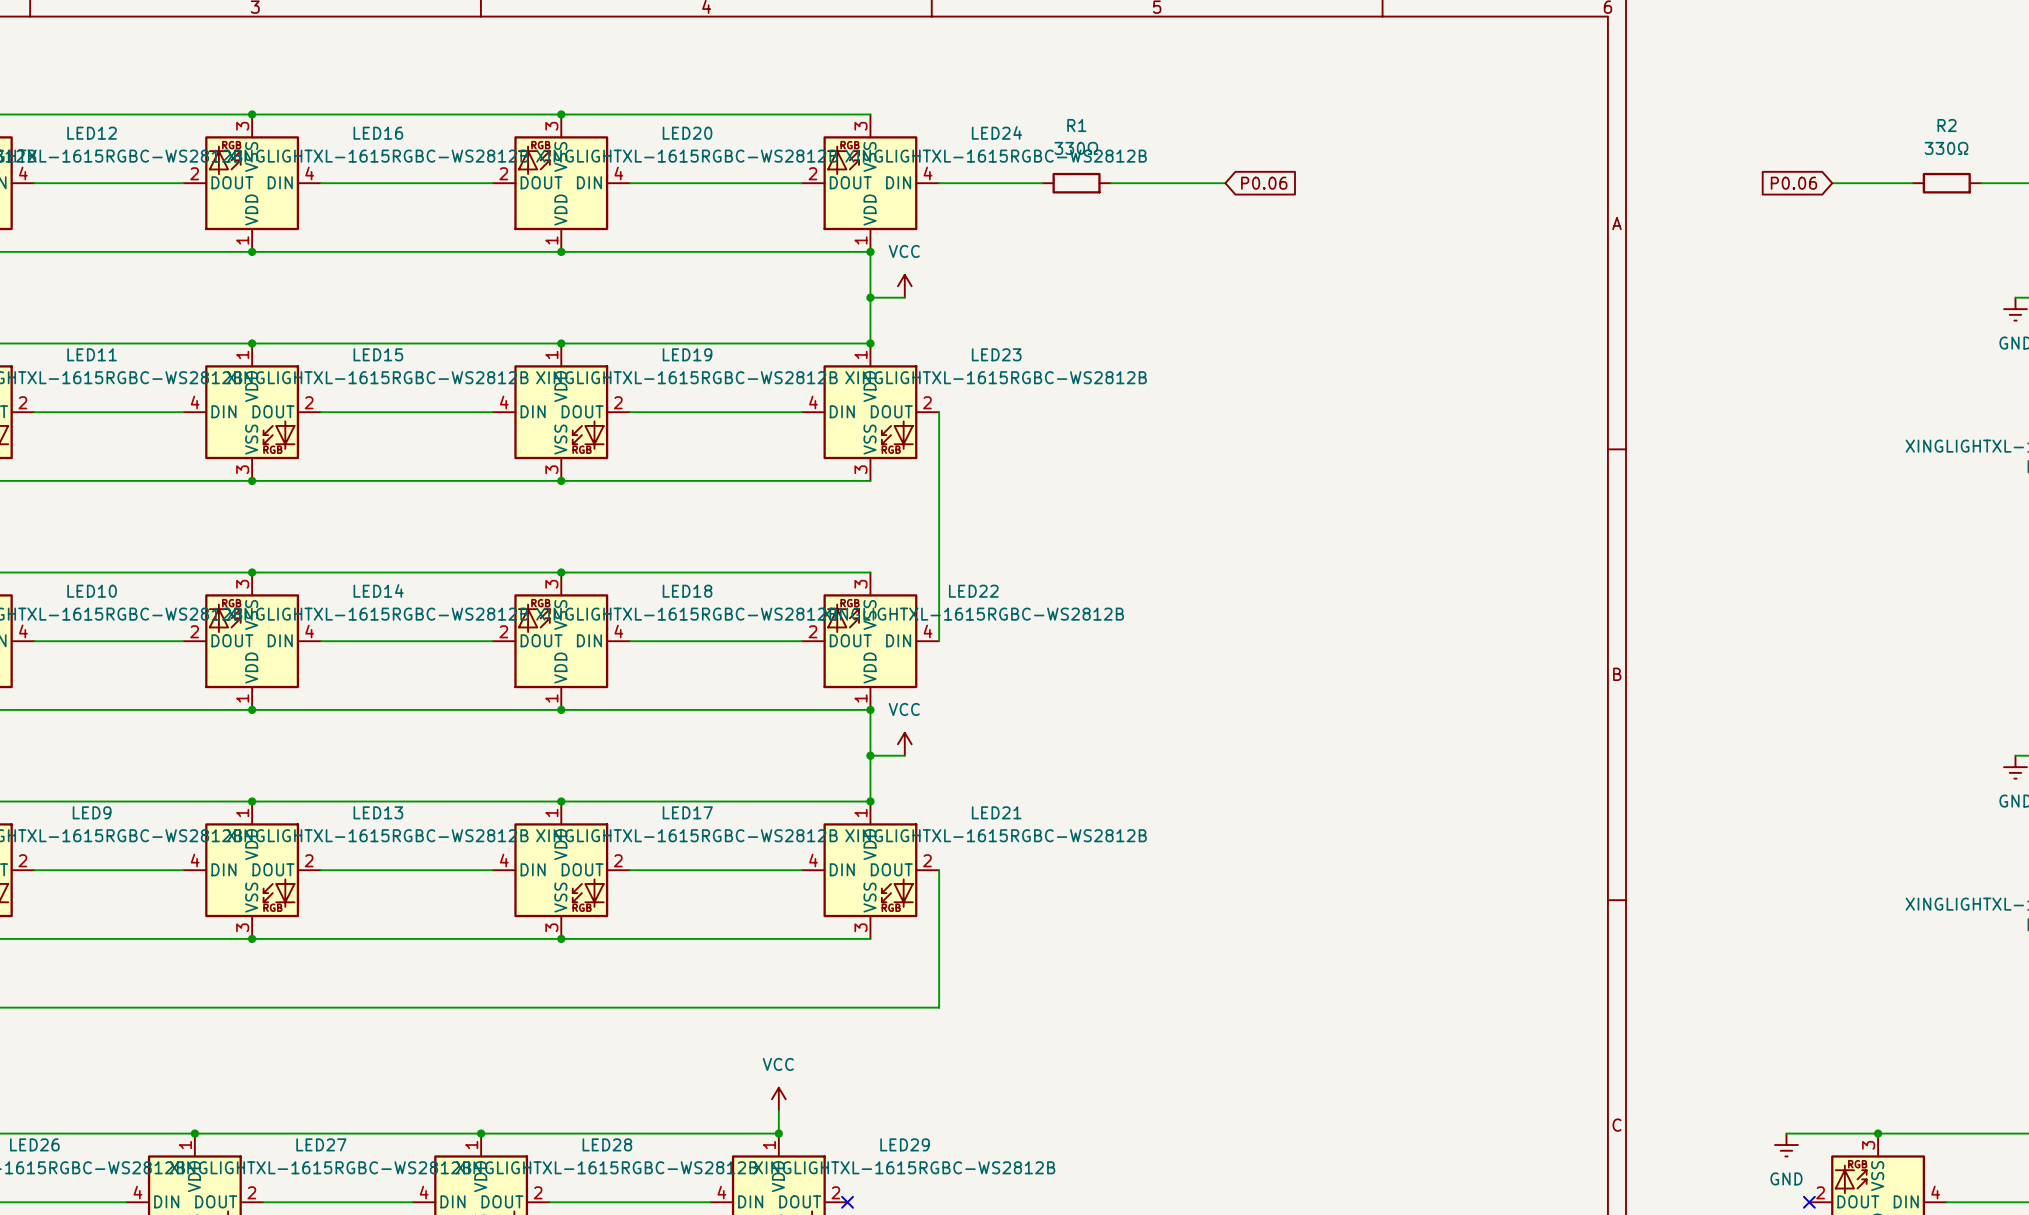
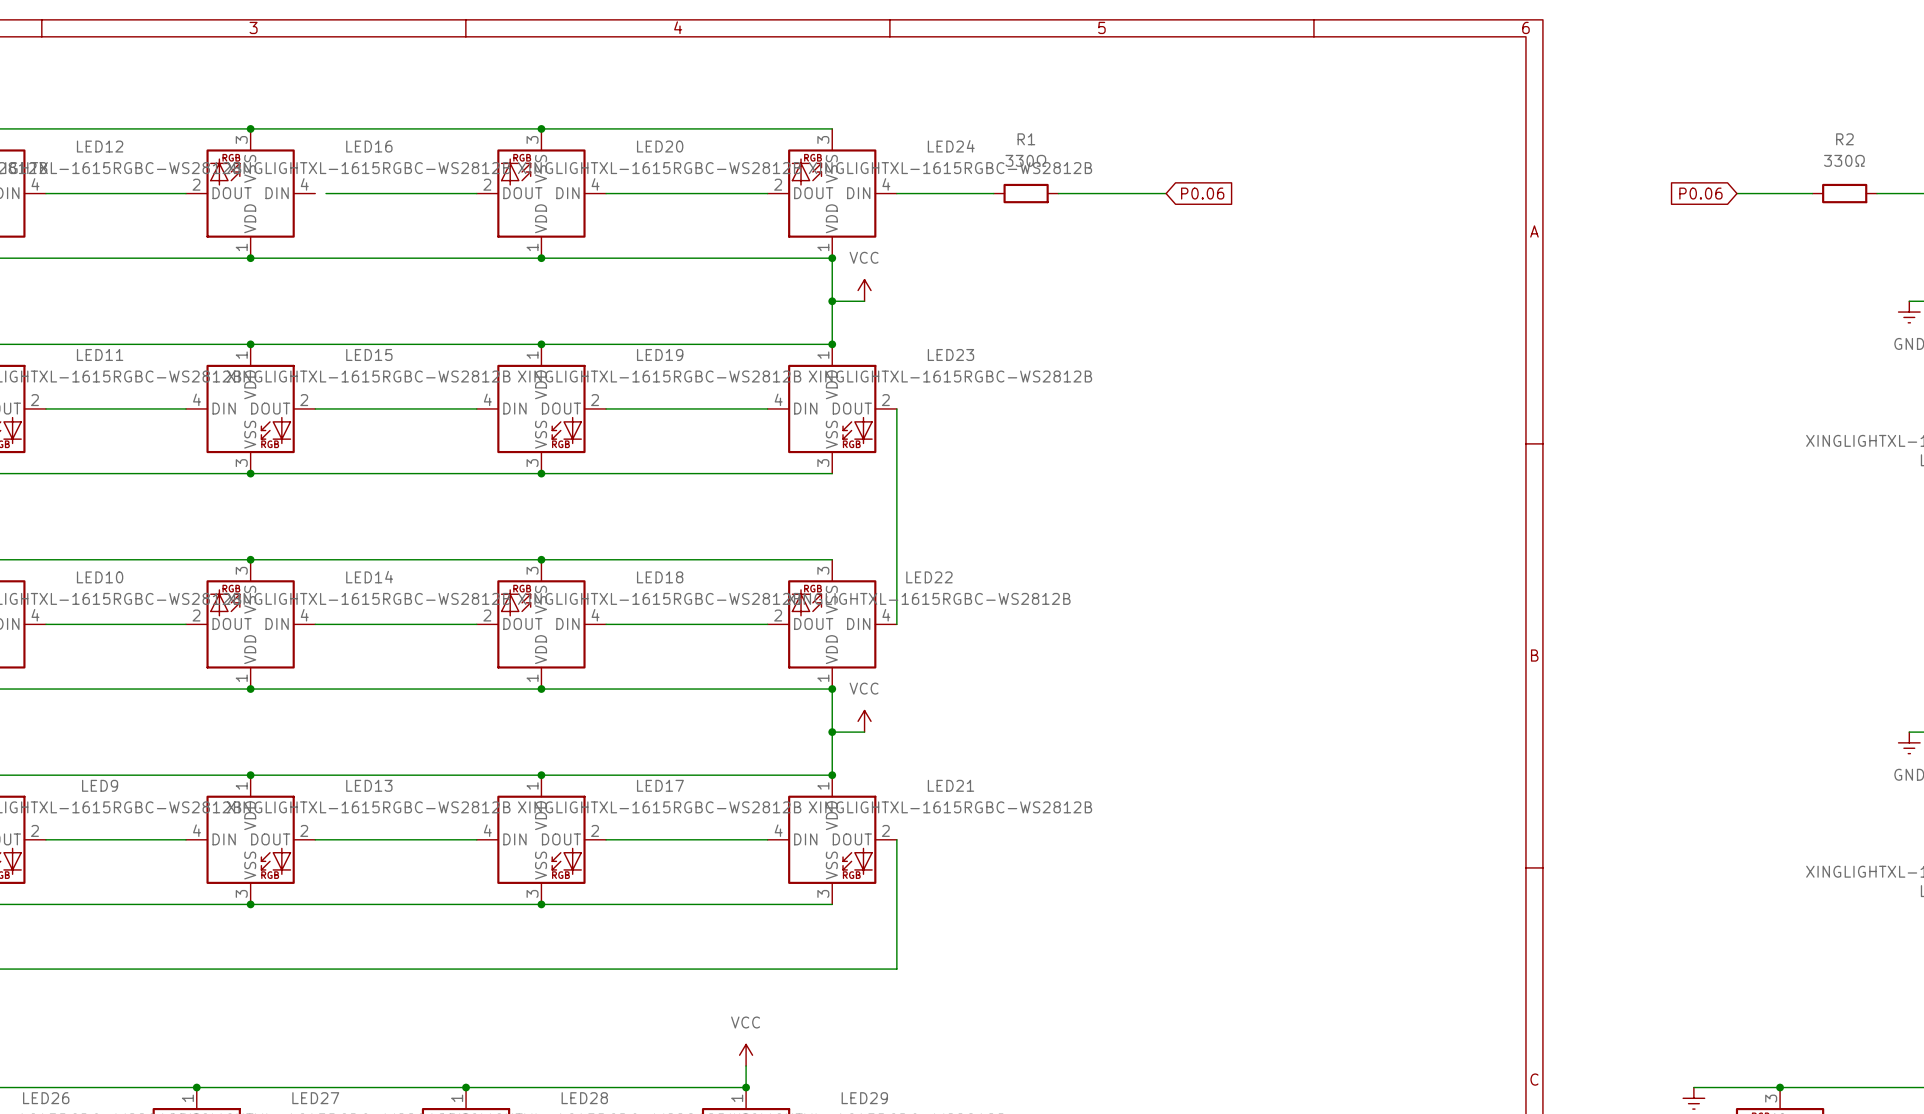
wire: (320, 183) (332, 183) -> none

